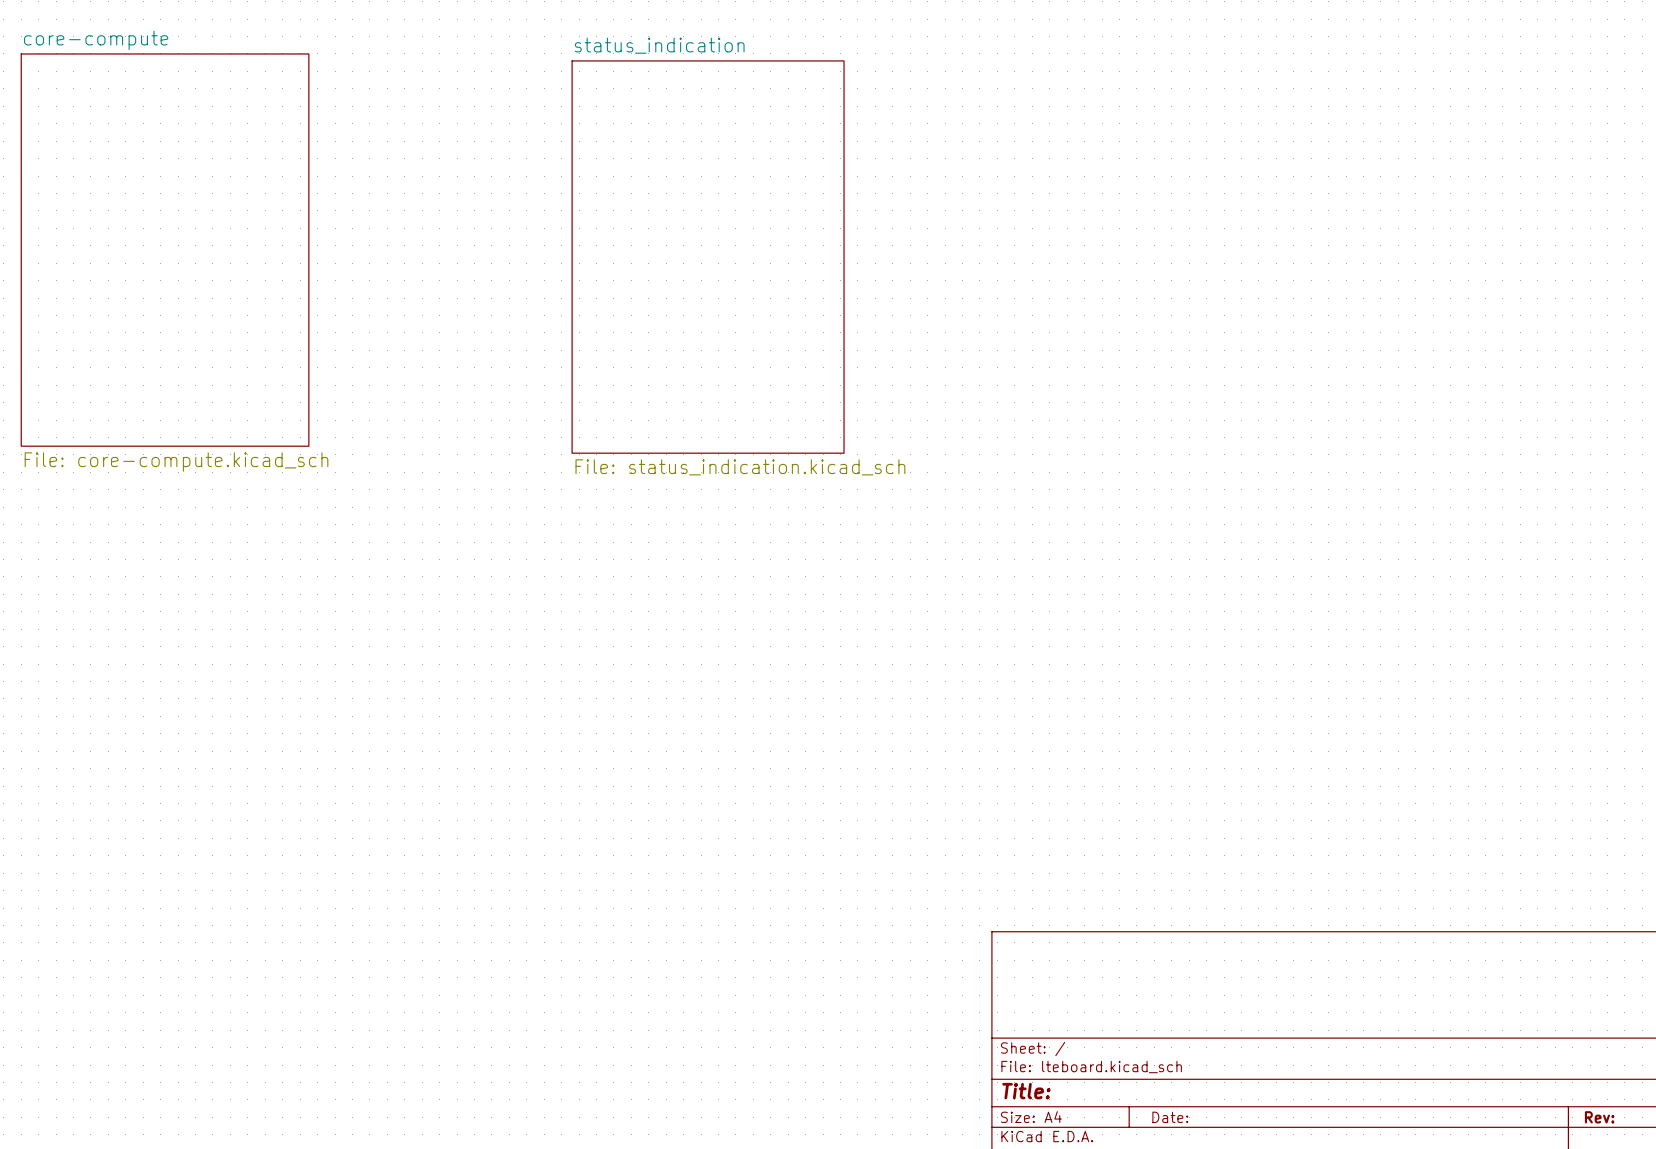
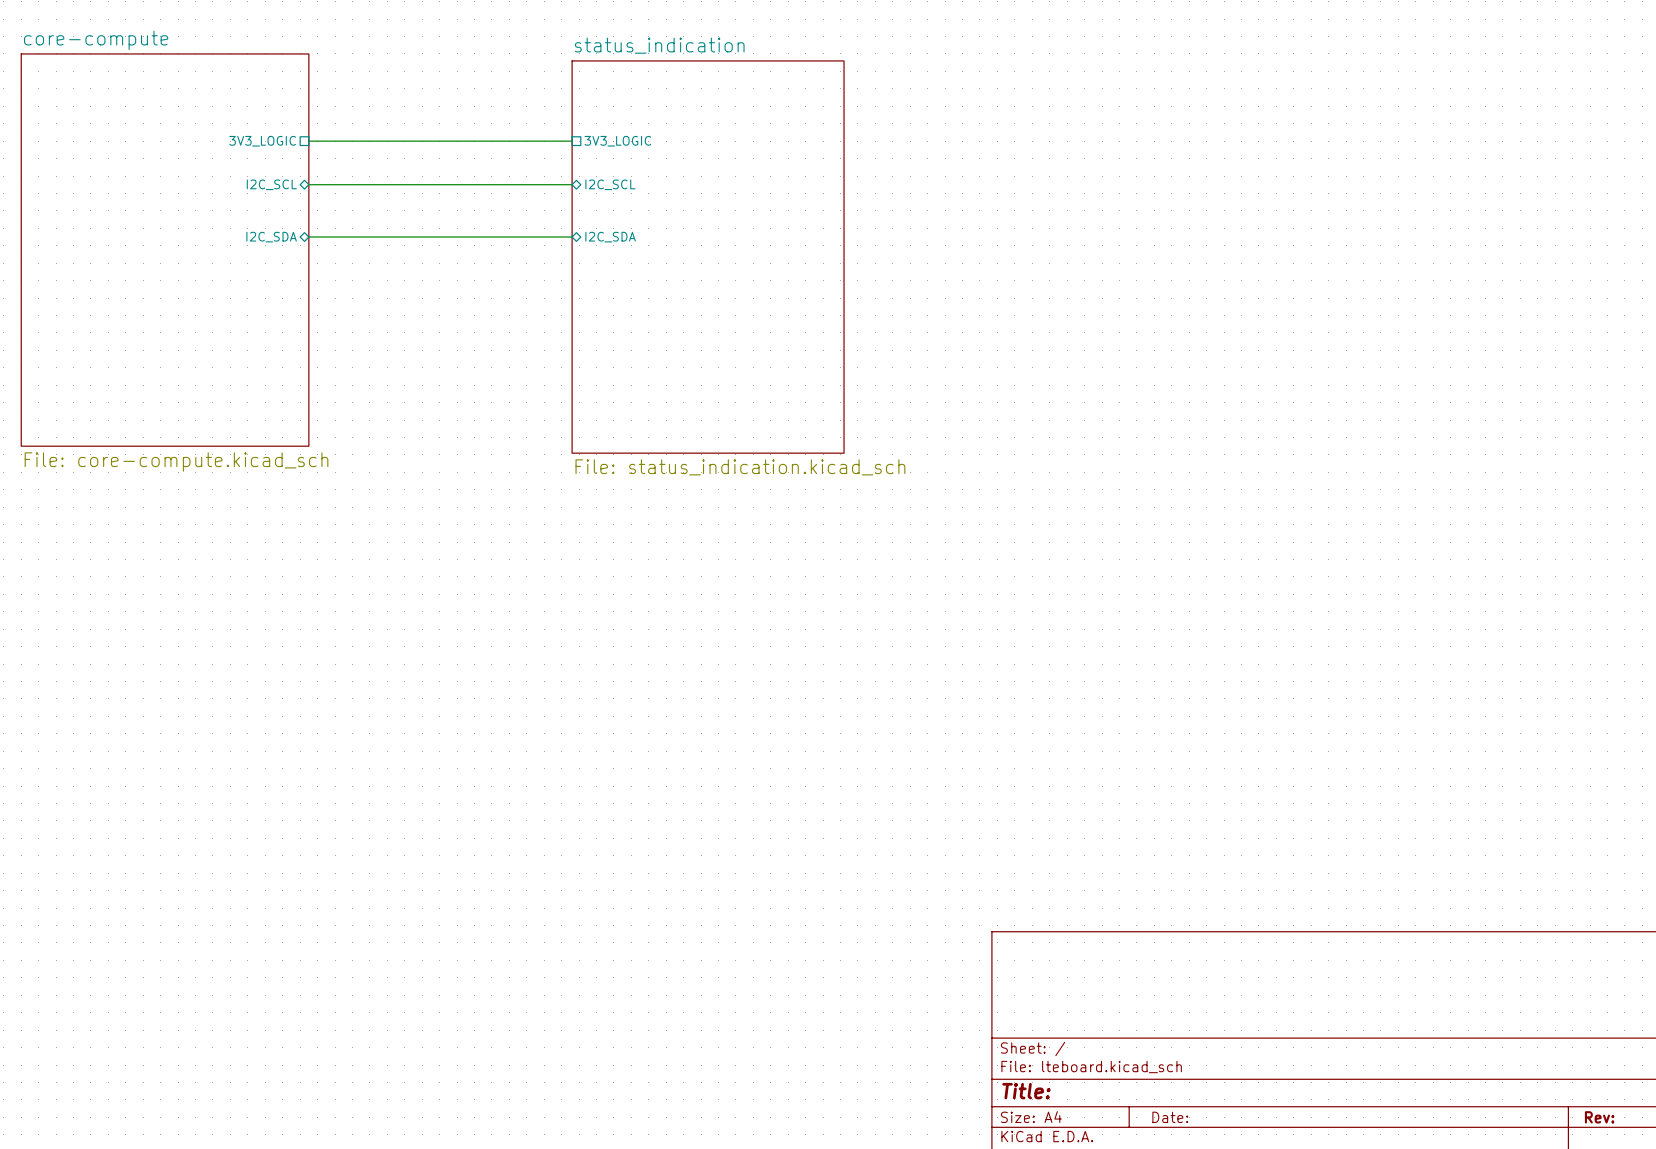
sheet pin: none -> 3V3_LOGIC (262, 141)
wire: none -> (308, 141) (572, 141)
sheet pin: none -> 3V3_LOGIC (617, 141)
sheet pin: none -> I2C_SCL (271, 184)
wire: none -> (308, 184) (572, 184)
sheet pin: none -> I2C_SCL (610, 184)
sheet pin: none -> I2C_SDA (271, 237)
wire: none -> (308, 237) (572, 237)
sheet pin: none -> I2C_SDA (610, 237)

